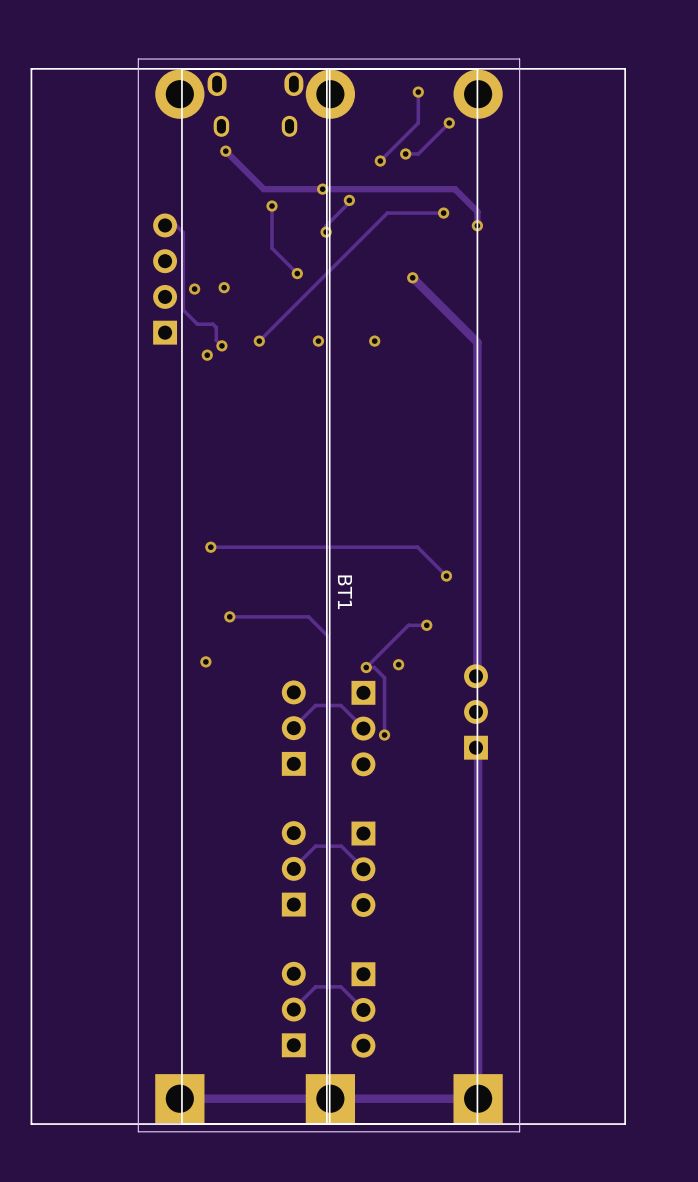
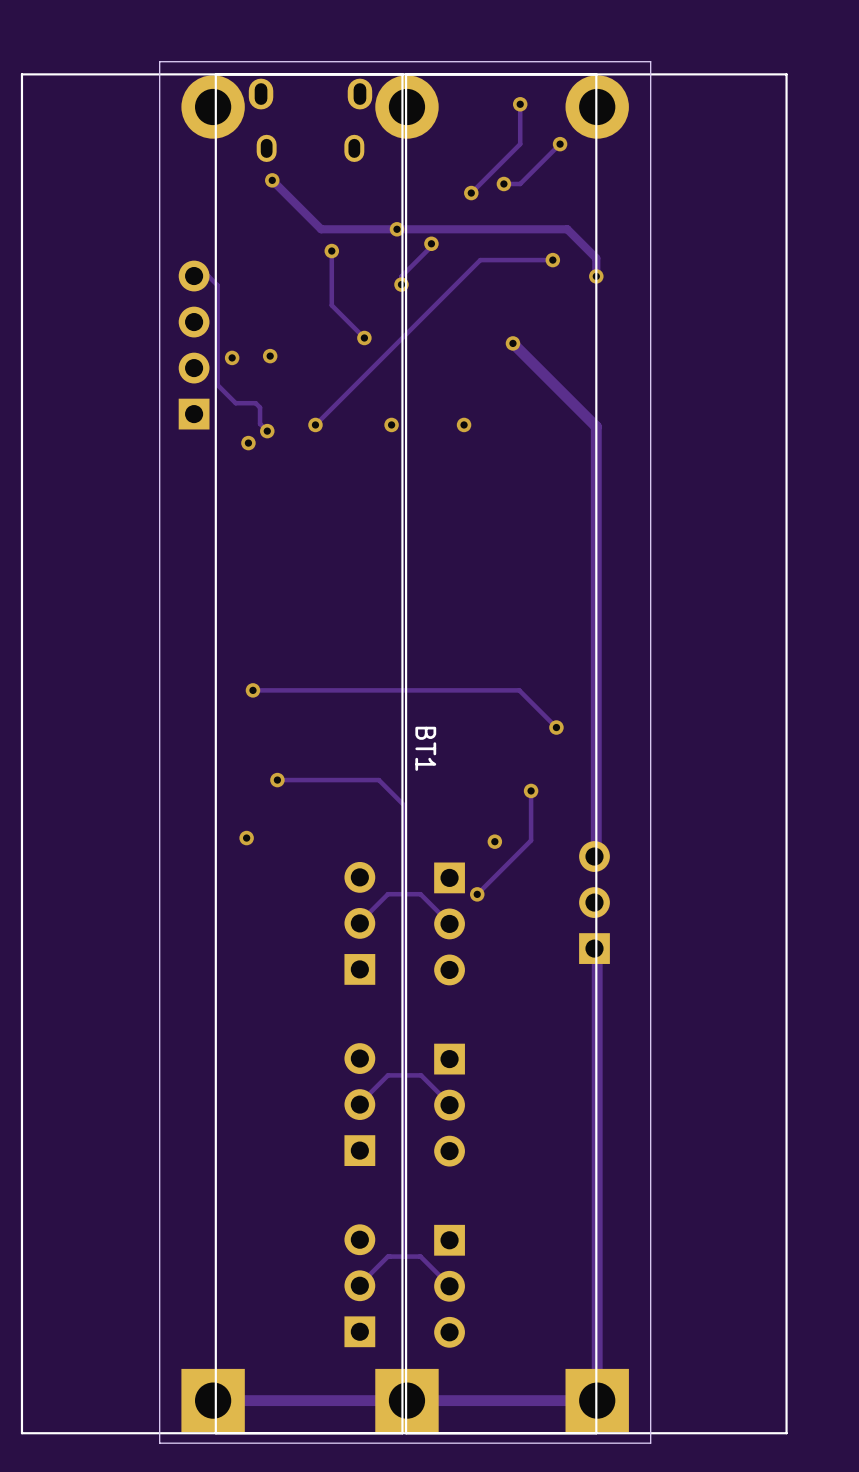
track: (426, 625) (408, 625) (366, 667) (374, 667) (384, 677) (384, 735) -> (531, 790) (531, 840) (477, 894)
via: (366, 667) -> none
via: none -> (477, 894)
via: (384, 735) -> none

